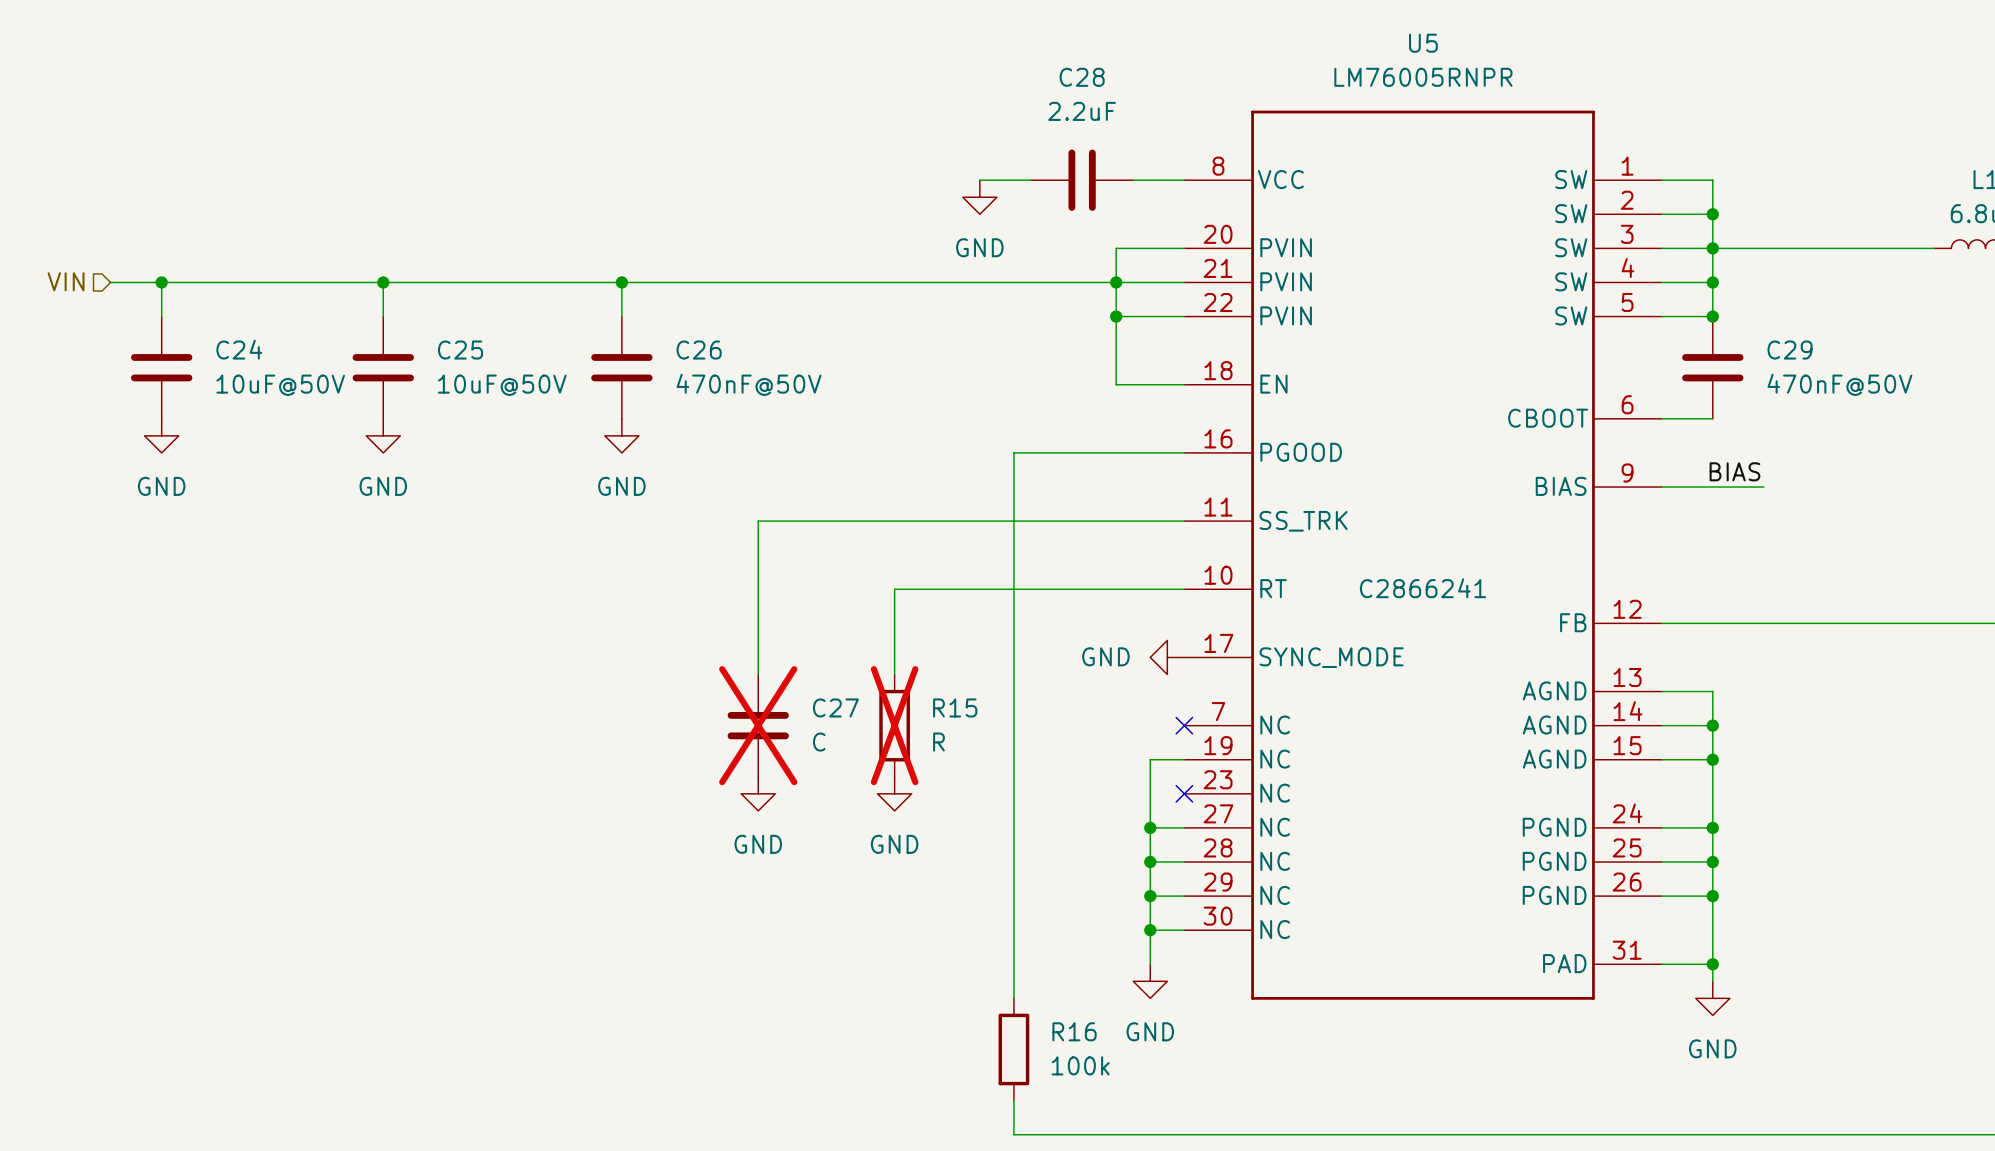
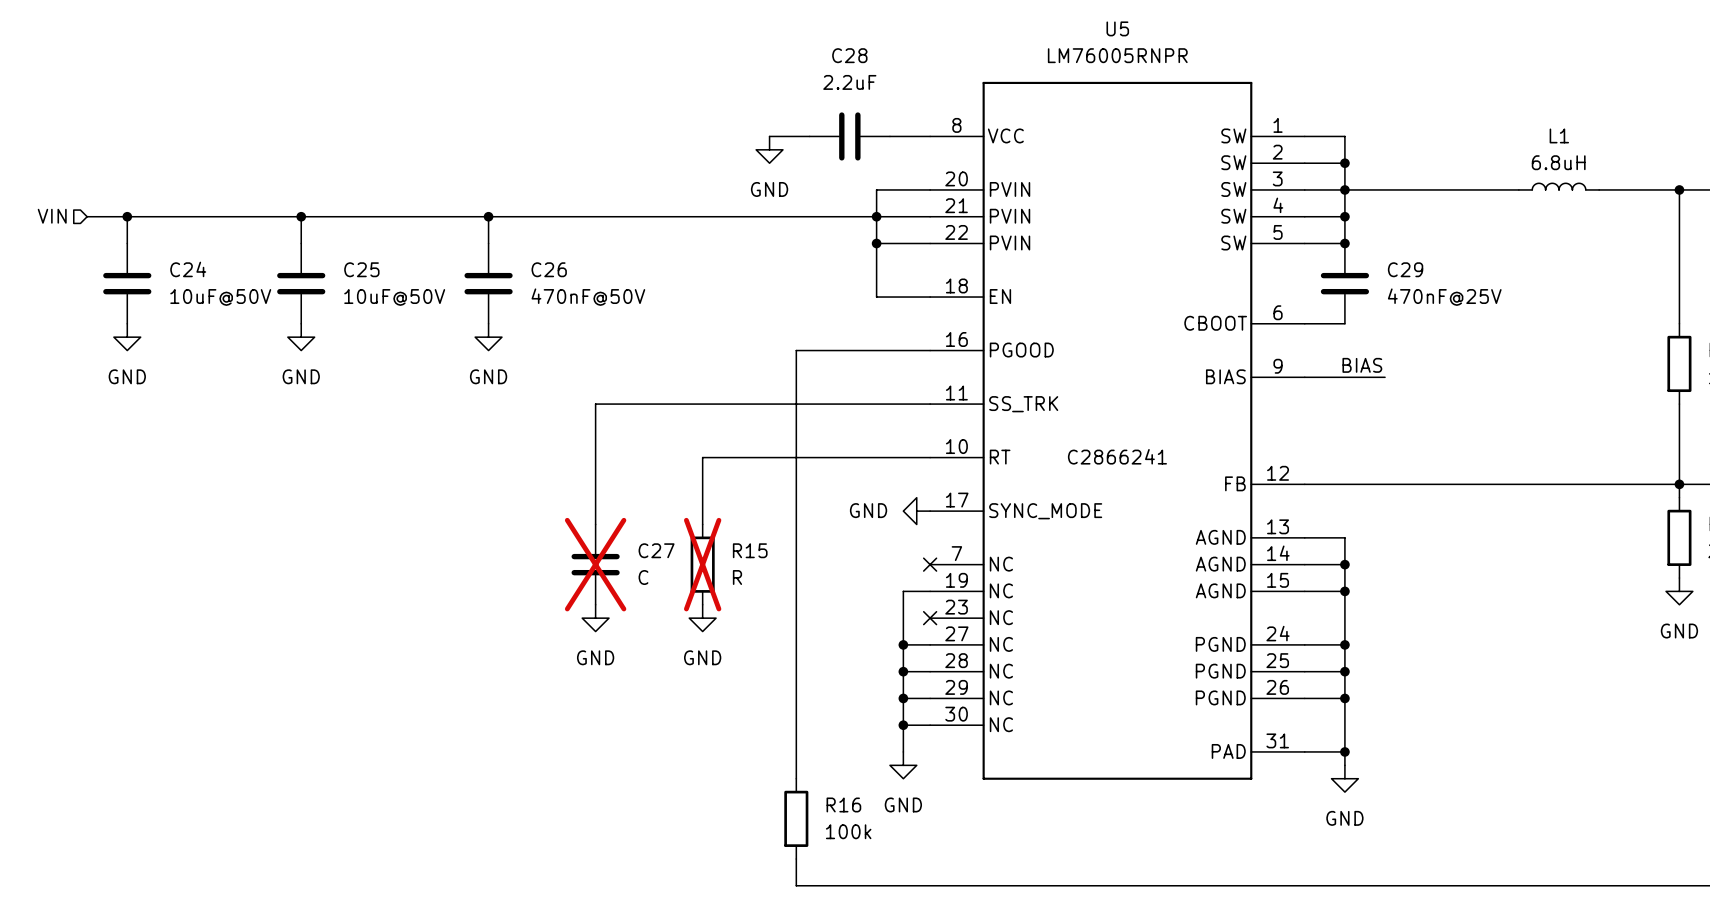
C29 value: 470nF@50V (1839, 384) -> 470nF@25V (1444, 297)

